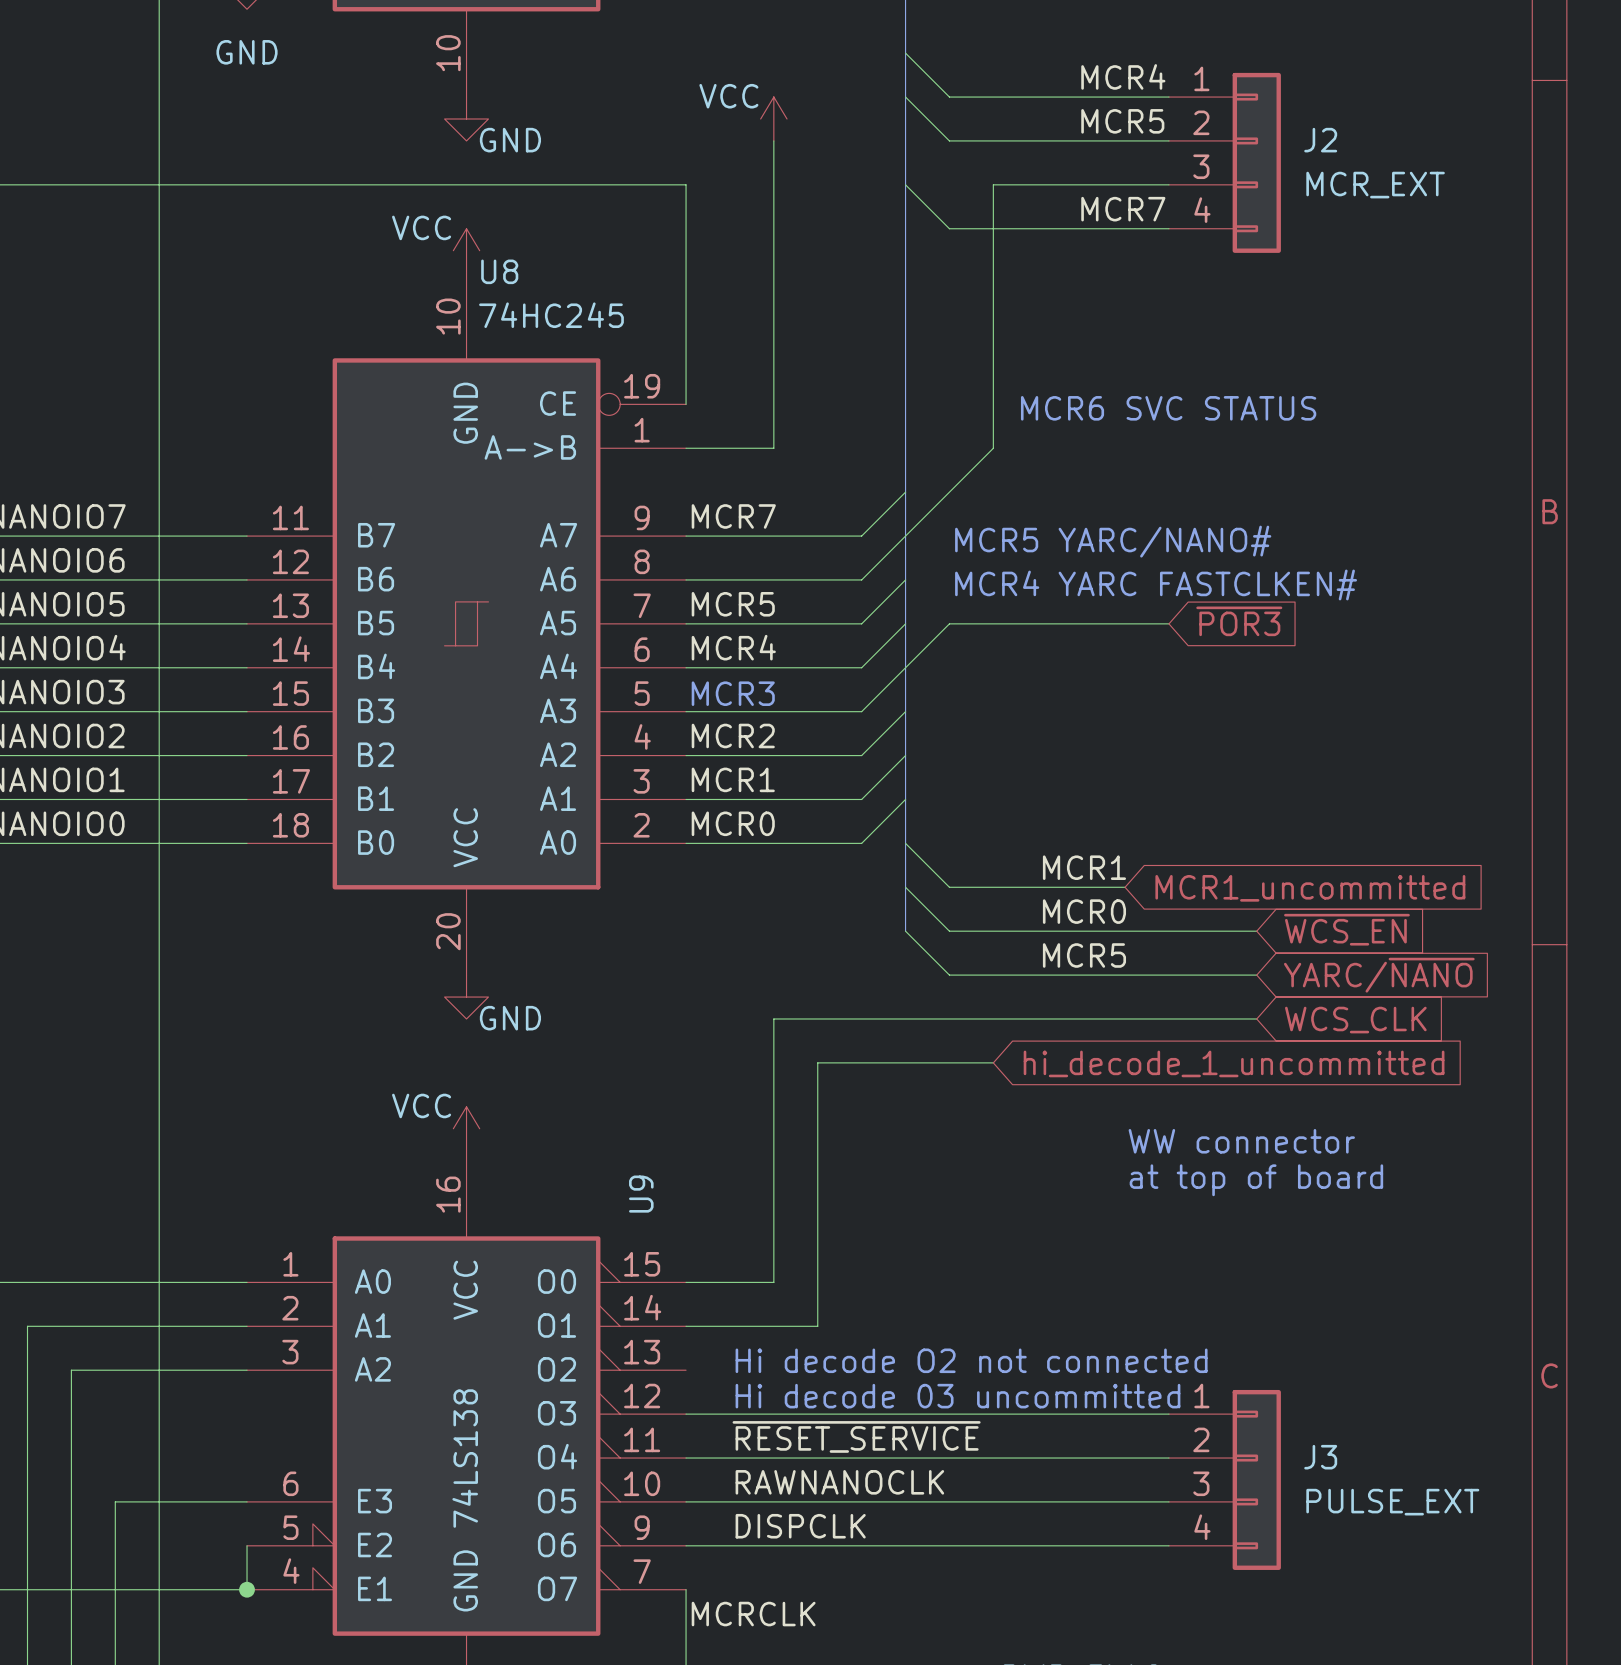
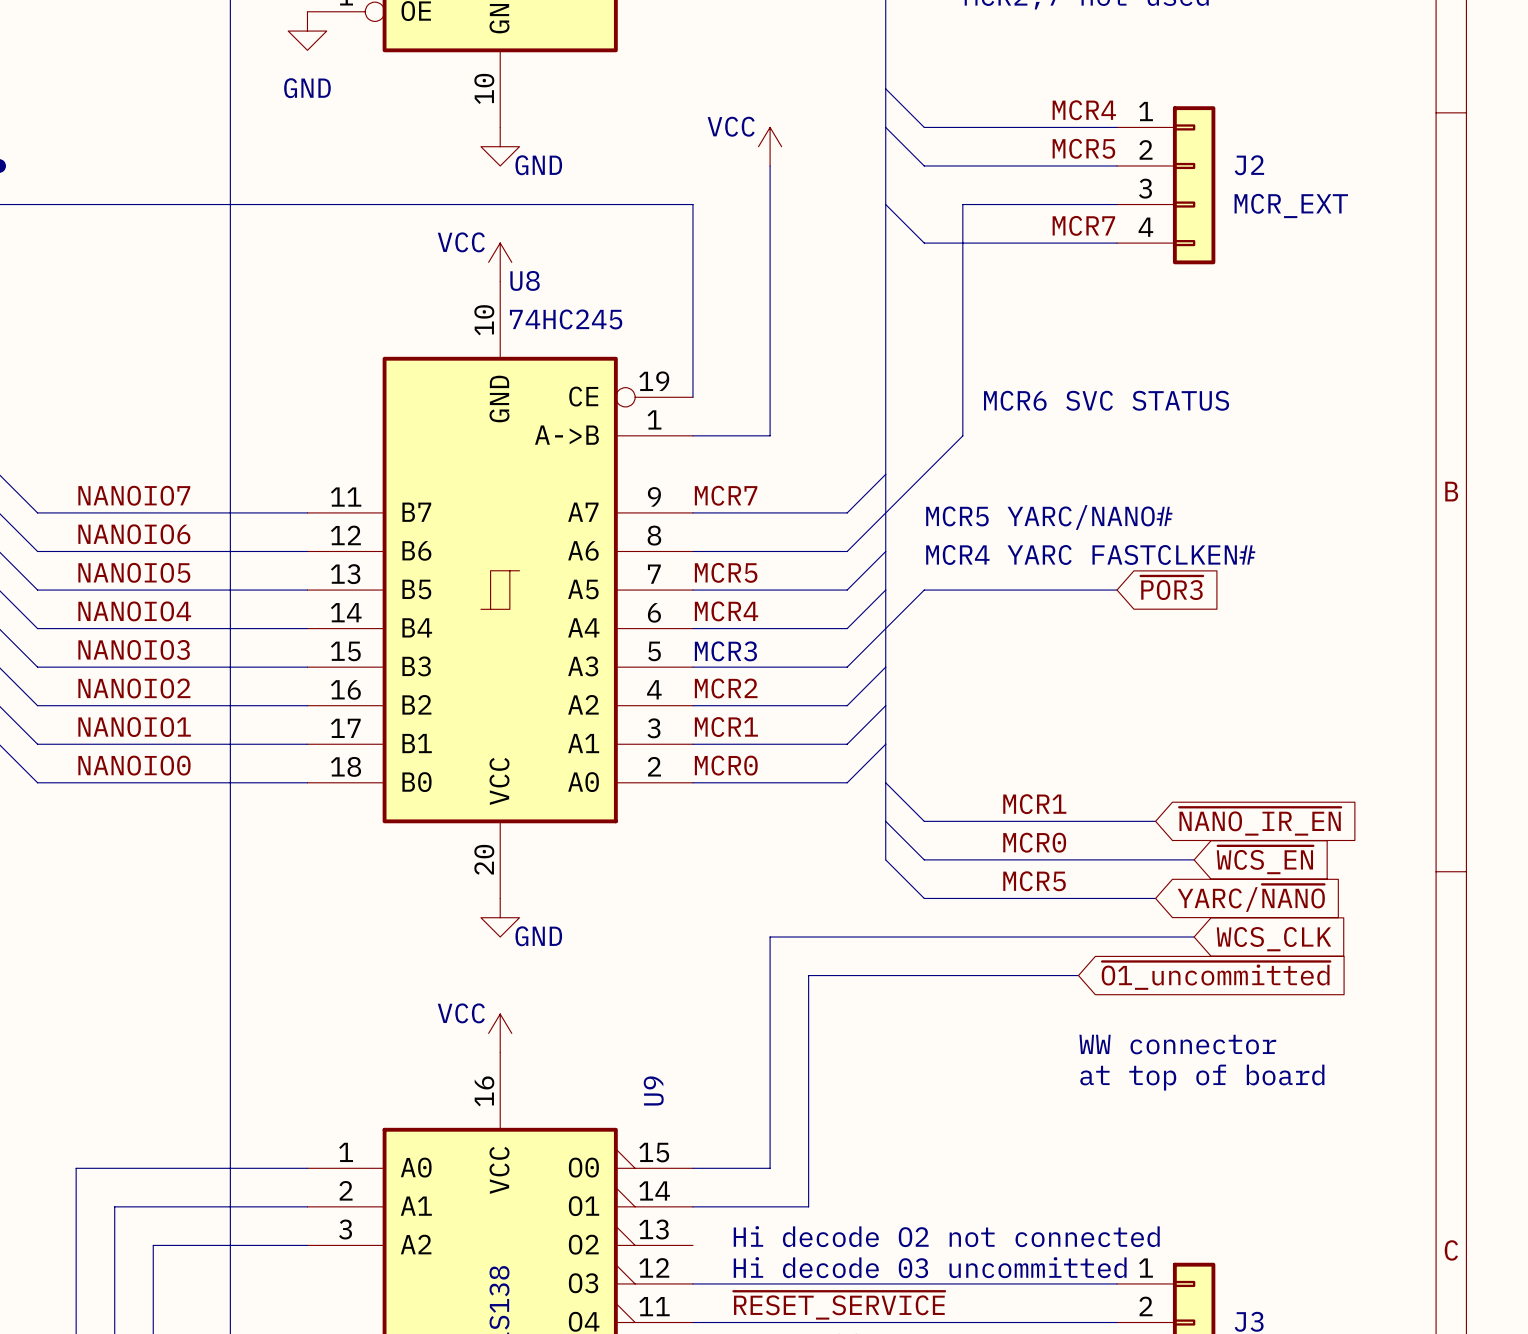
global label: none -> ~{NANO_IR_EN} (1260, 821)
wire: none -> (1078, 821) (1155, 821)
global label: MCR1_uncommitted (1310, 888) -> none
wire: (1212, 975) (1256, 975) -> none
global label position: YARC/~{NANO} (1379, 975) -> YARC/~{NANO} (1251, 898)
wire: none -> (962, 975) (1078, 975)
global label: hi_decode_1_uncommitted (1234, 1063) -> ~{O1_uncommitted} (1215, 975)

